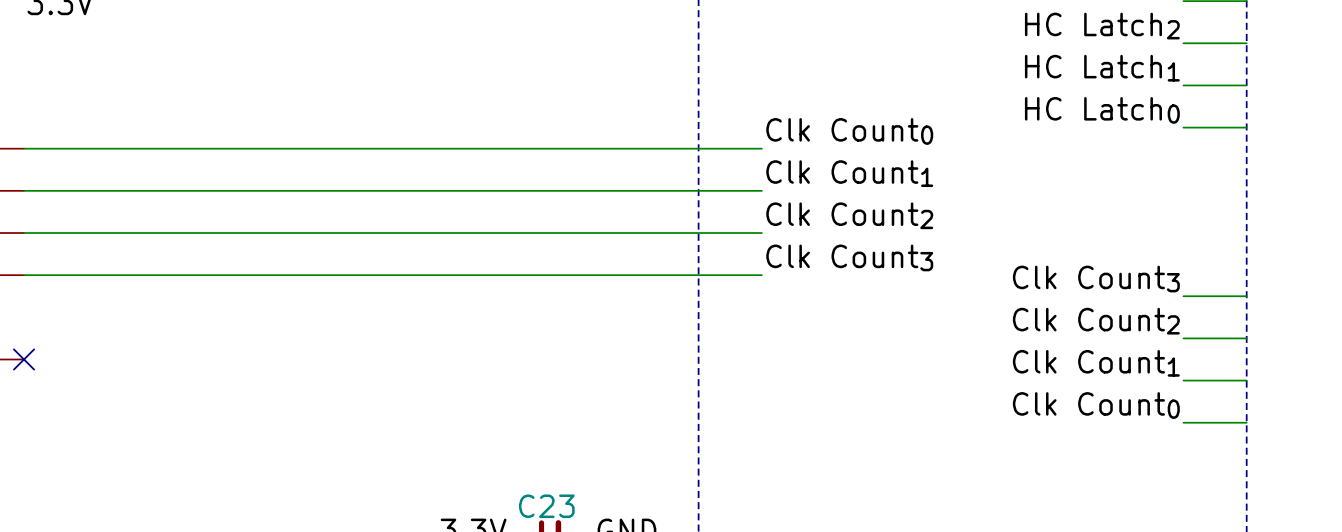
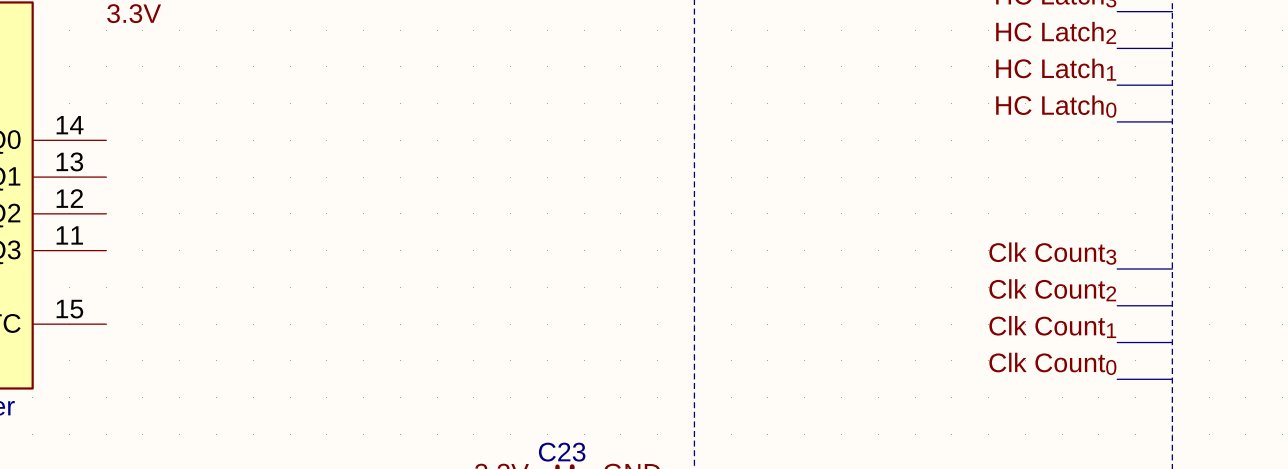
label: Clk Count0 (849, 131) -> none
wire: (24, 148) (761, 148) -> none
label: Clk Count1 (849, 173) -> none
wire: (24, 190) (761, 190) -> none
label: Clk Count2 (849, 215) -> none
wire: (24, 233) (761, 233) -> none
label: Clk Count3 (849, 257) -> none
wire: (24, 275) (761, 275) -> none
no-connect mark: (24, 359) -> none

